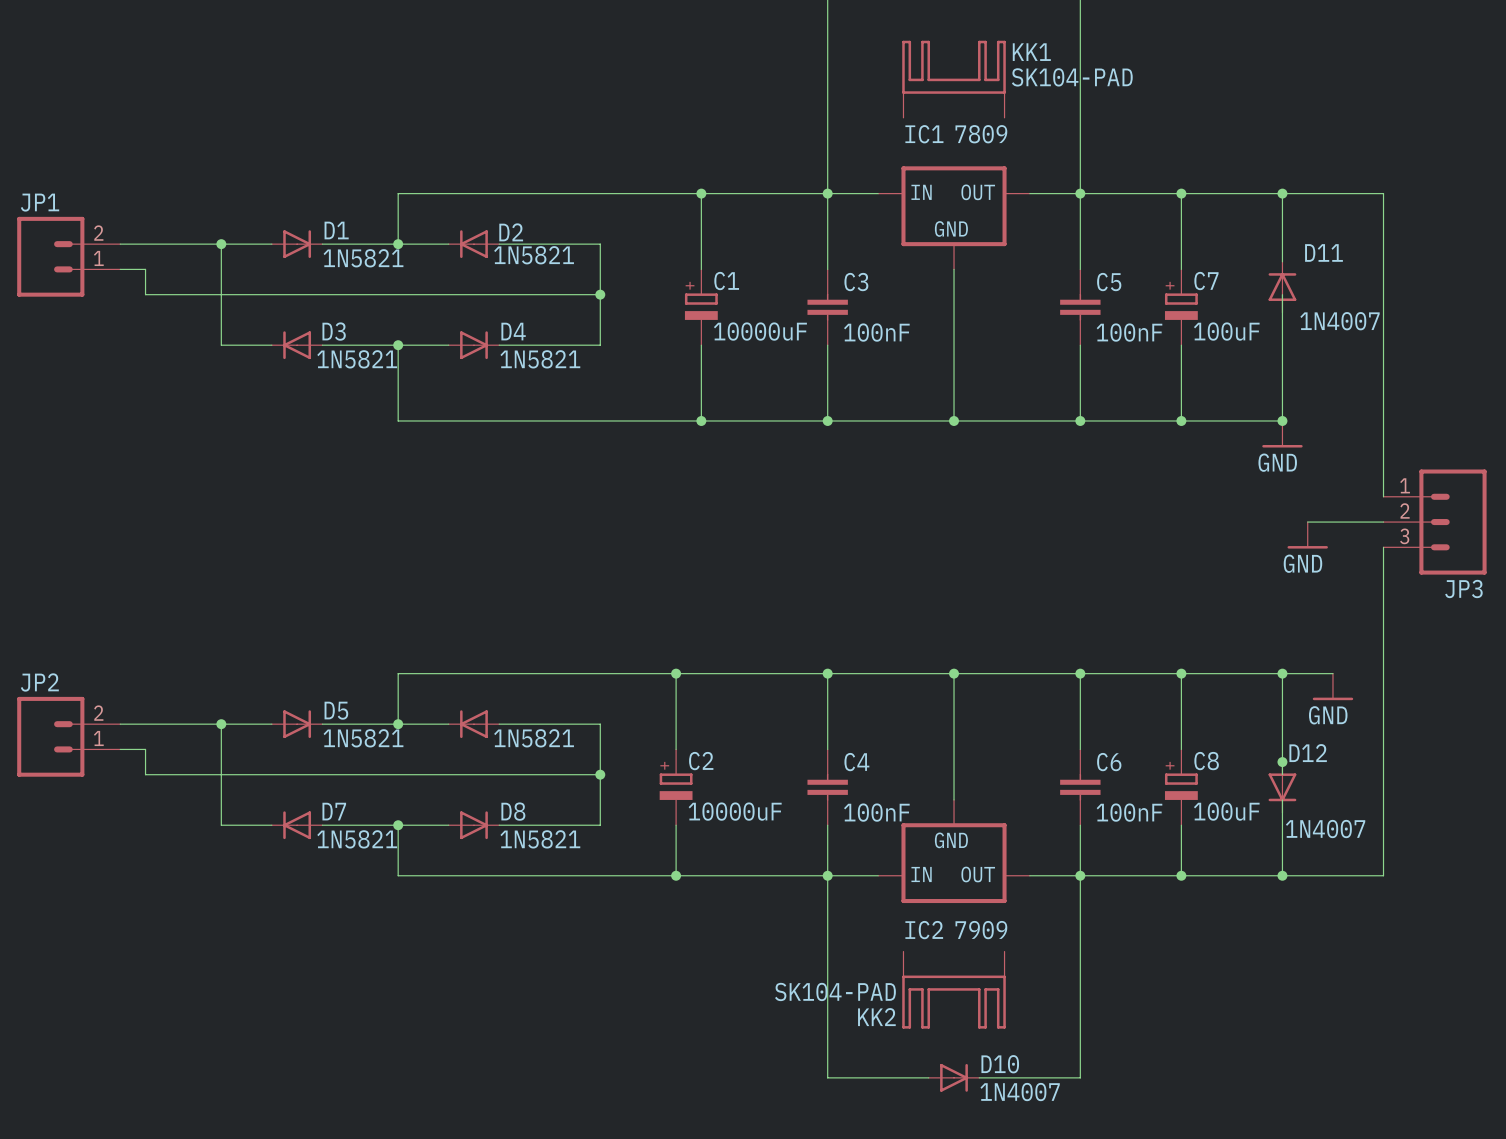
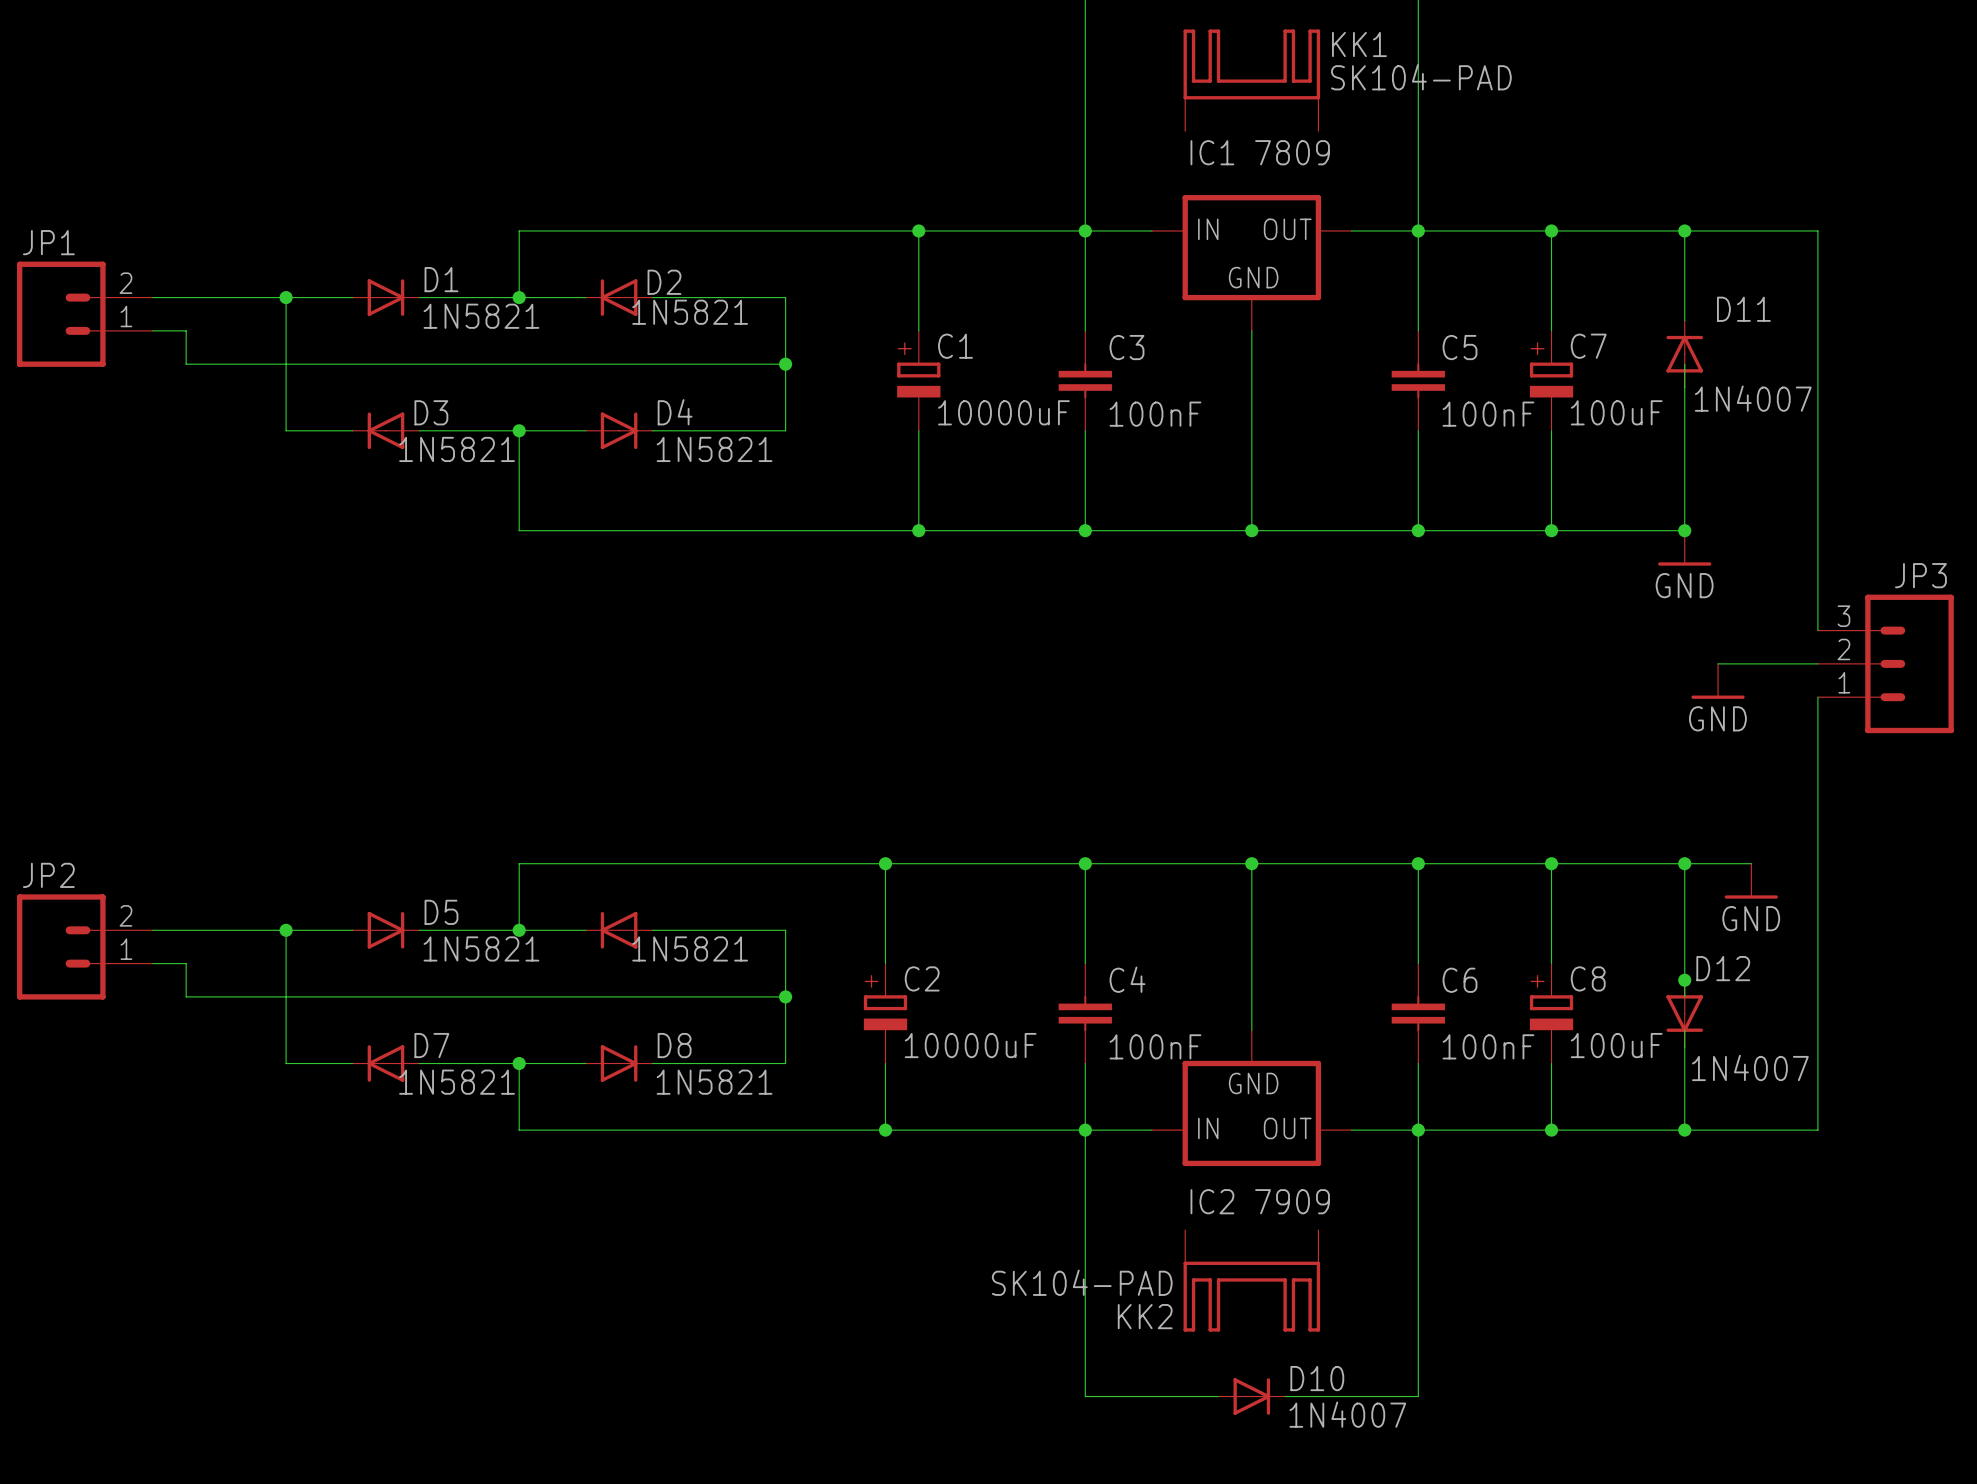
JP3 flip: as is (1452, 522) -> up-down (1909, 663)

